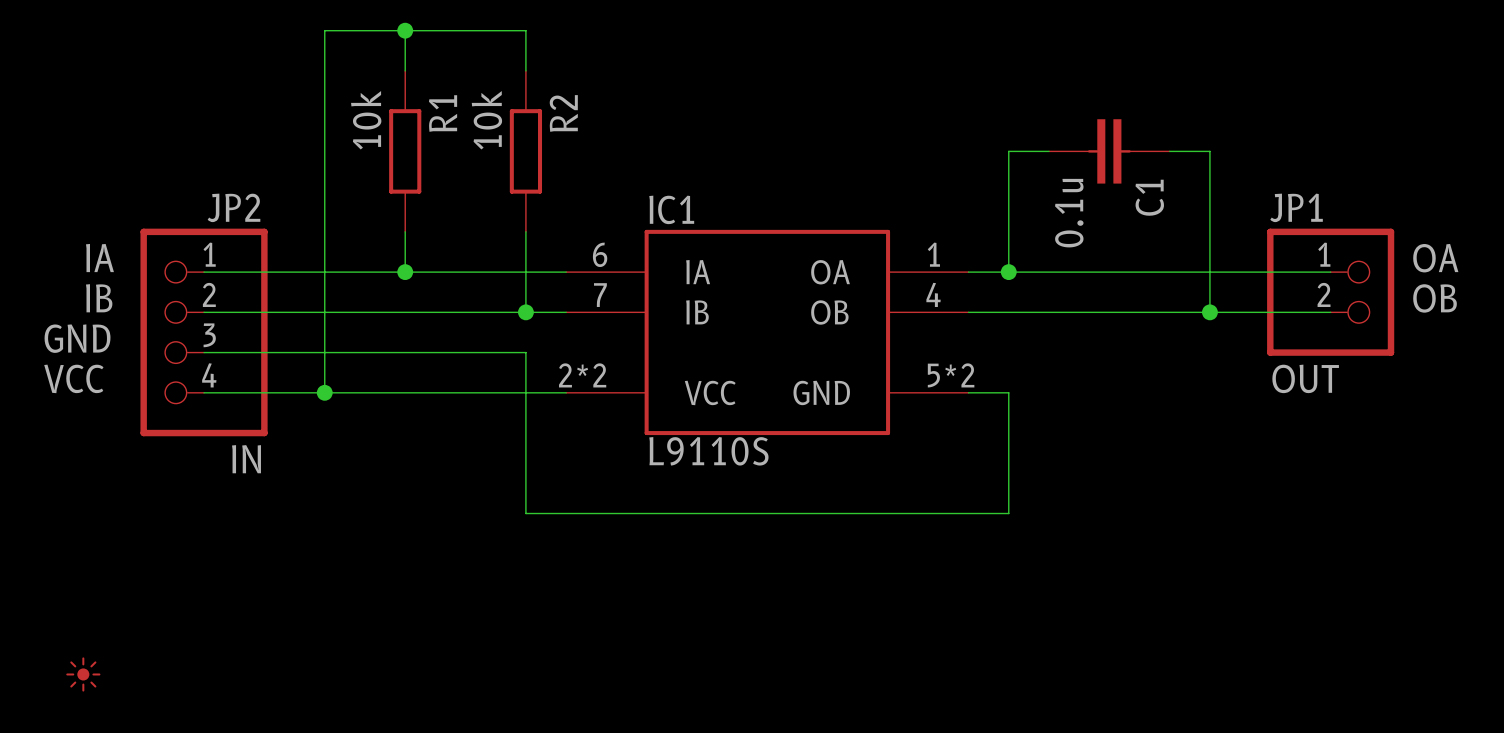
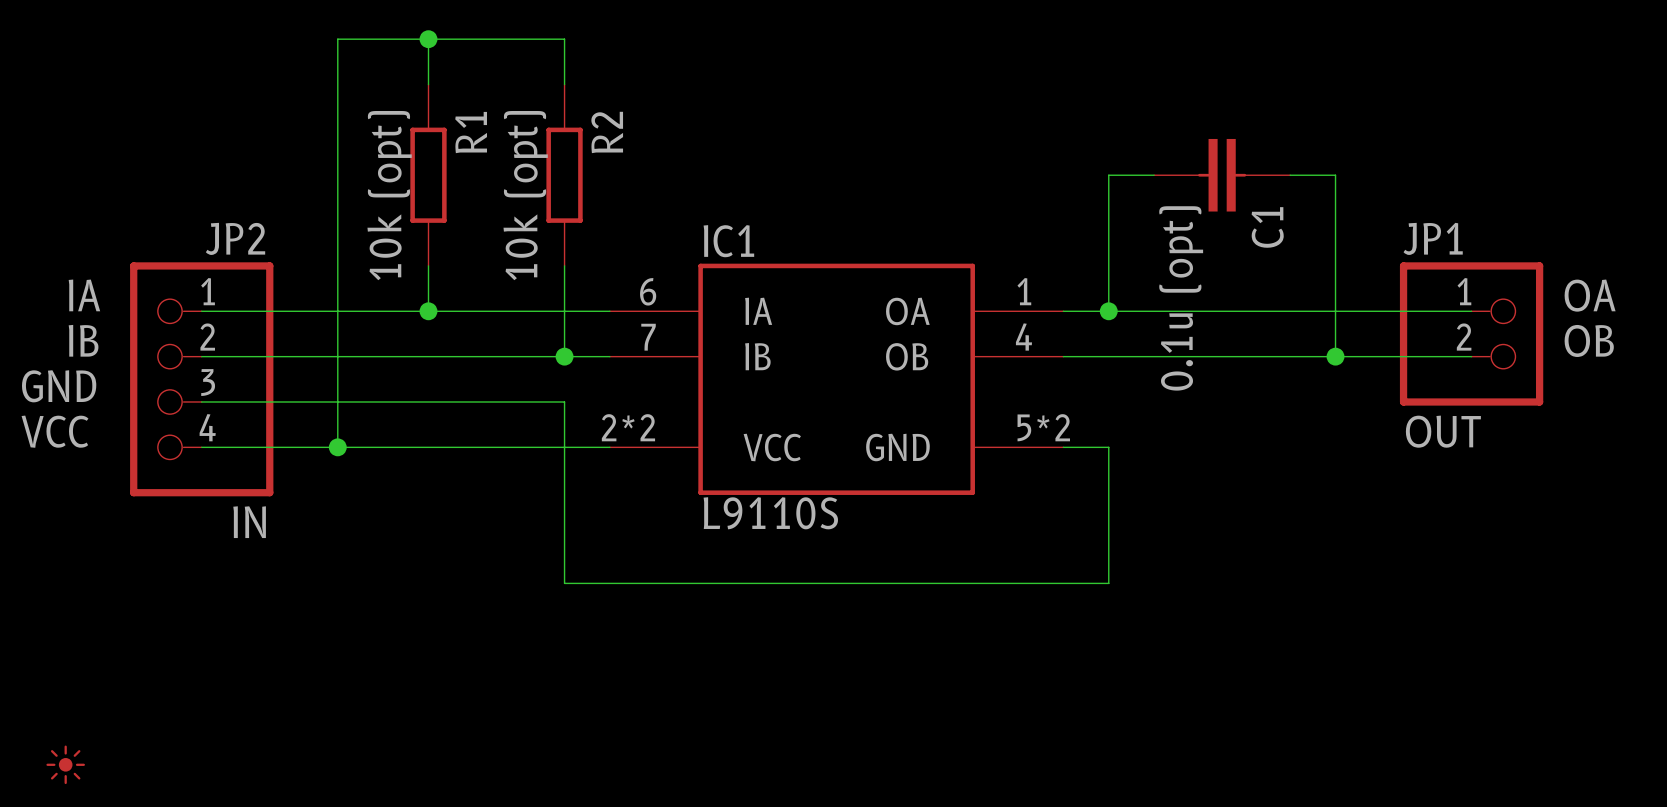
R1 value: 10k (366, 120) -> 10k (opt) (389, 195)
R2 value: 10k (486, 120) -> 10k (opt) (525, 195)
C1 value: 0.1u (1069, 213) -> 0.1u (opt) (1181, 298)

